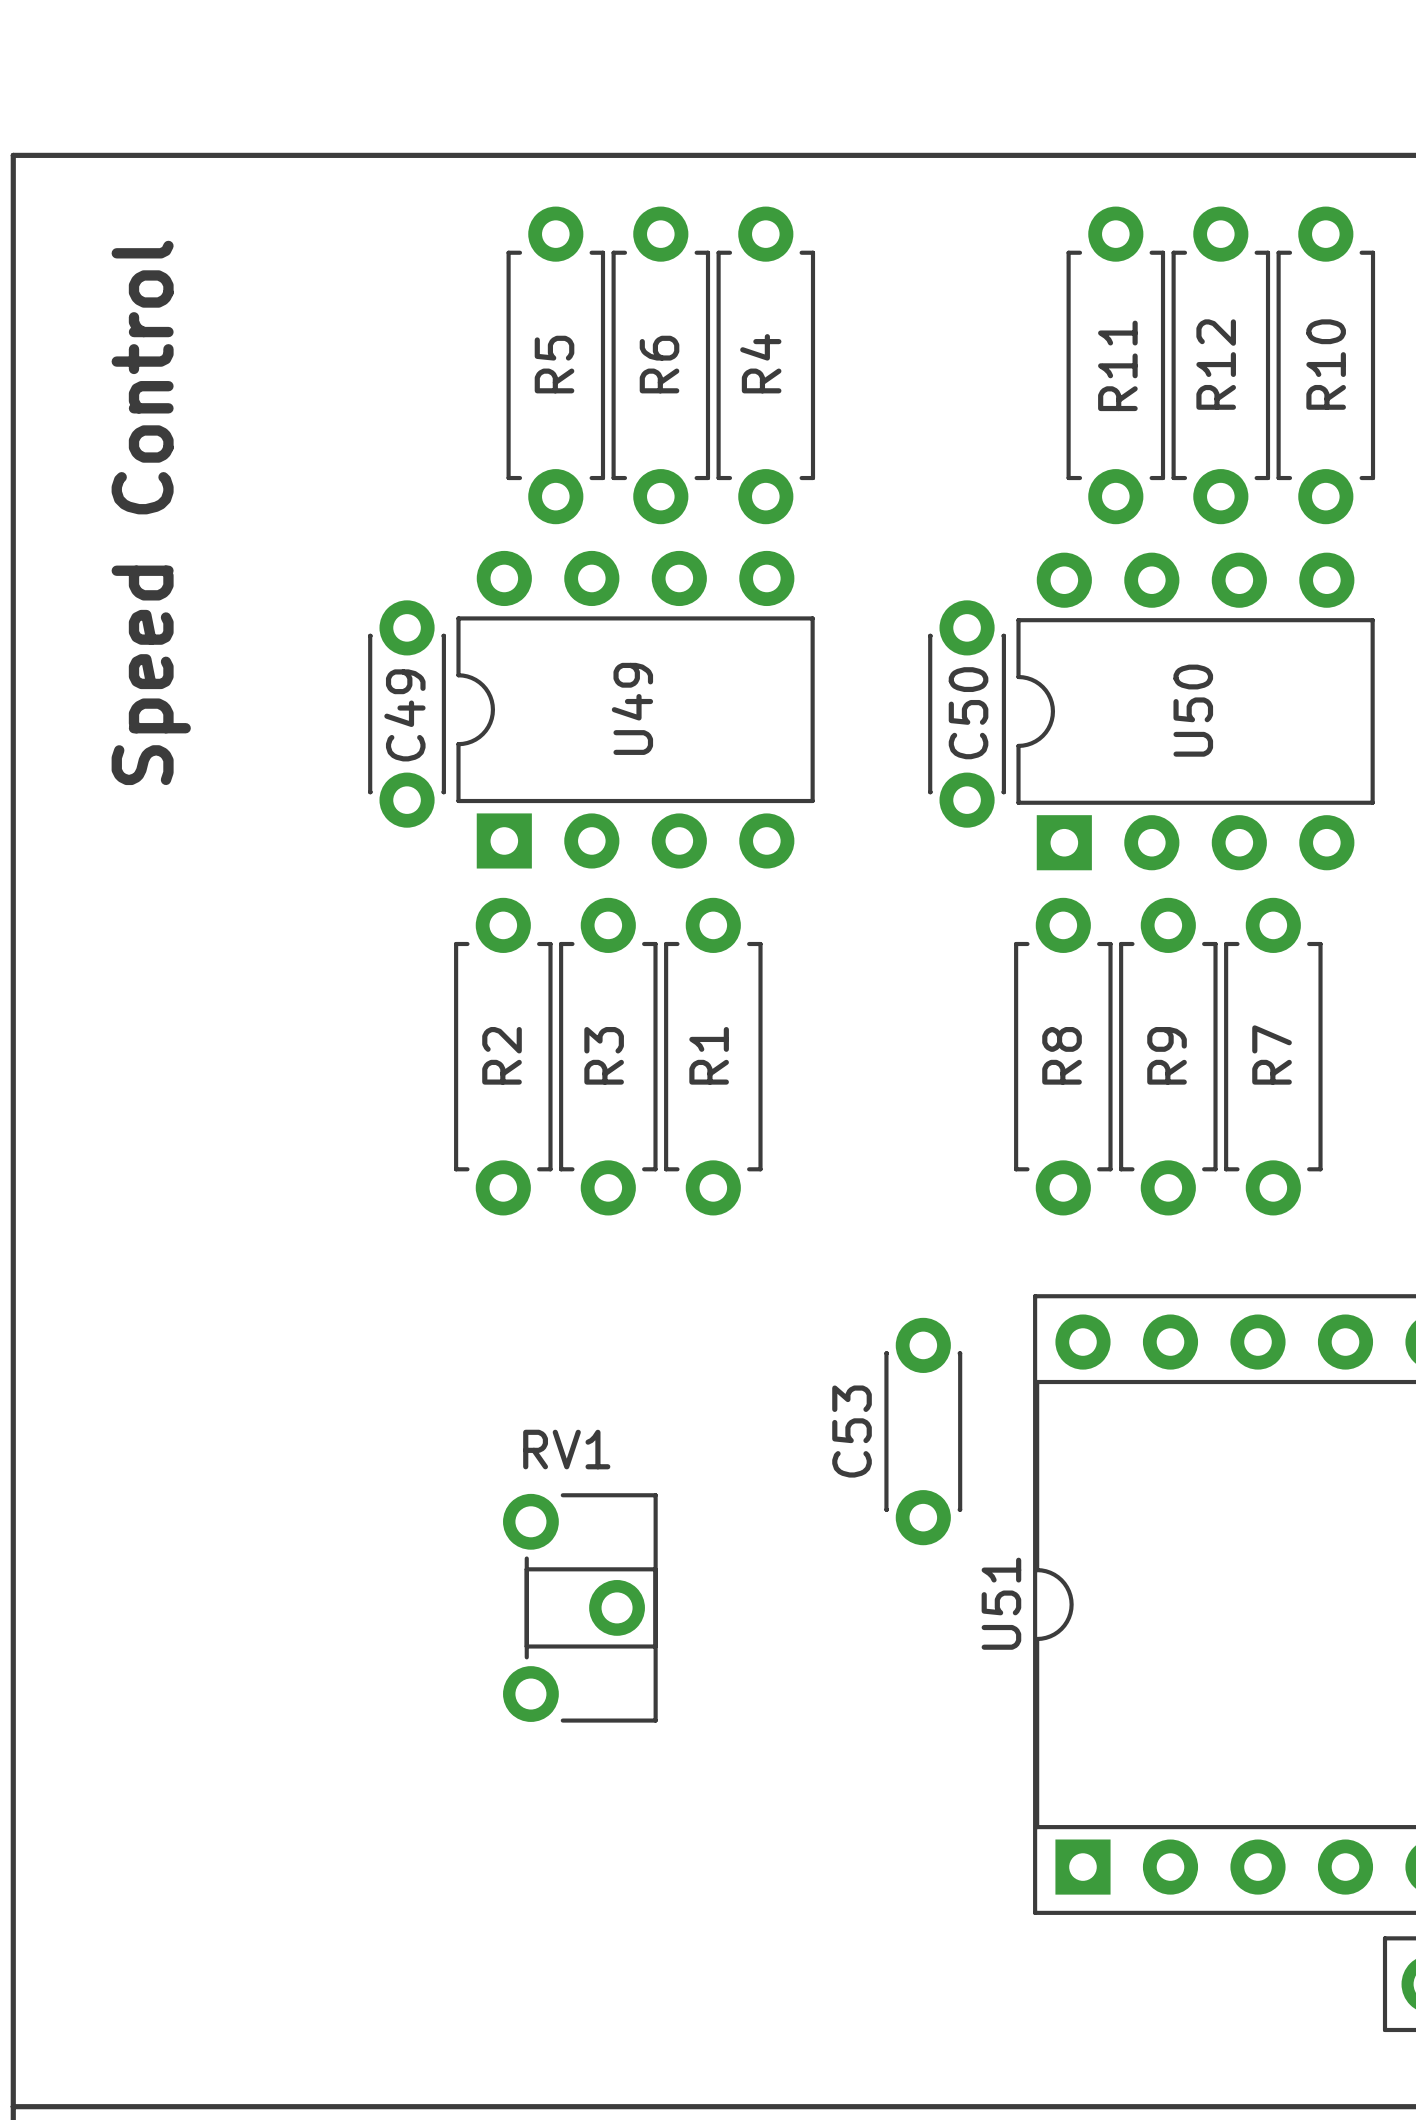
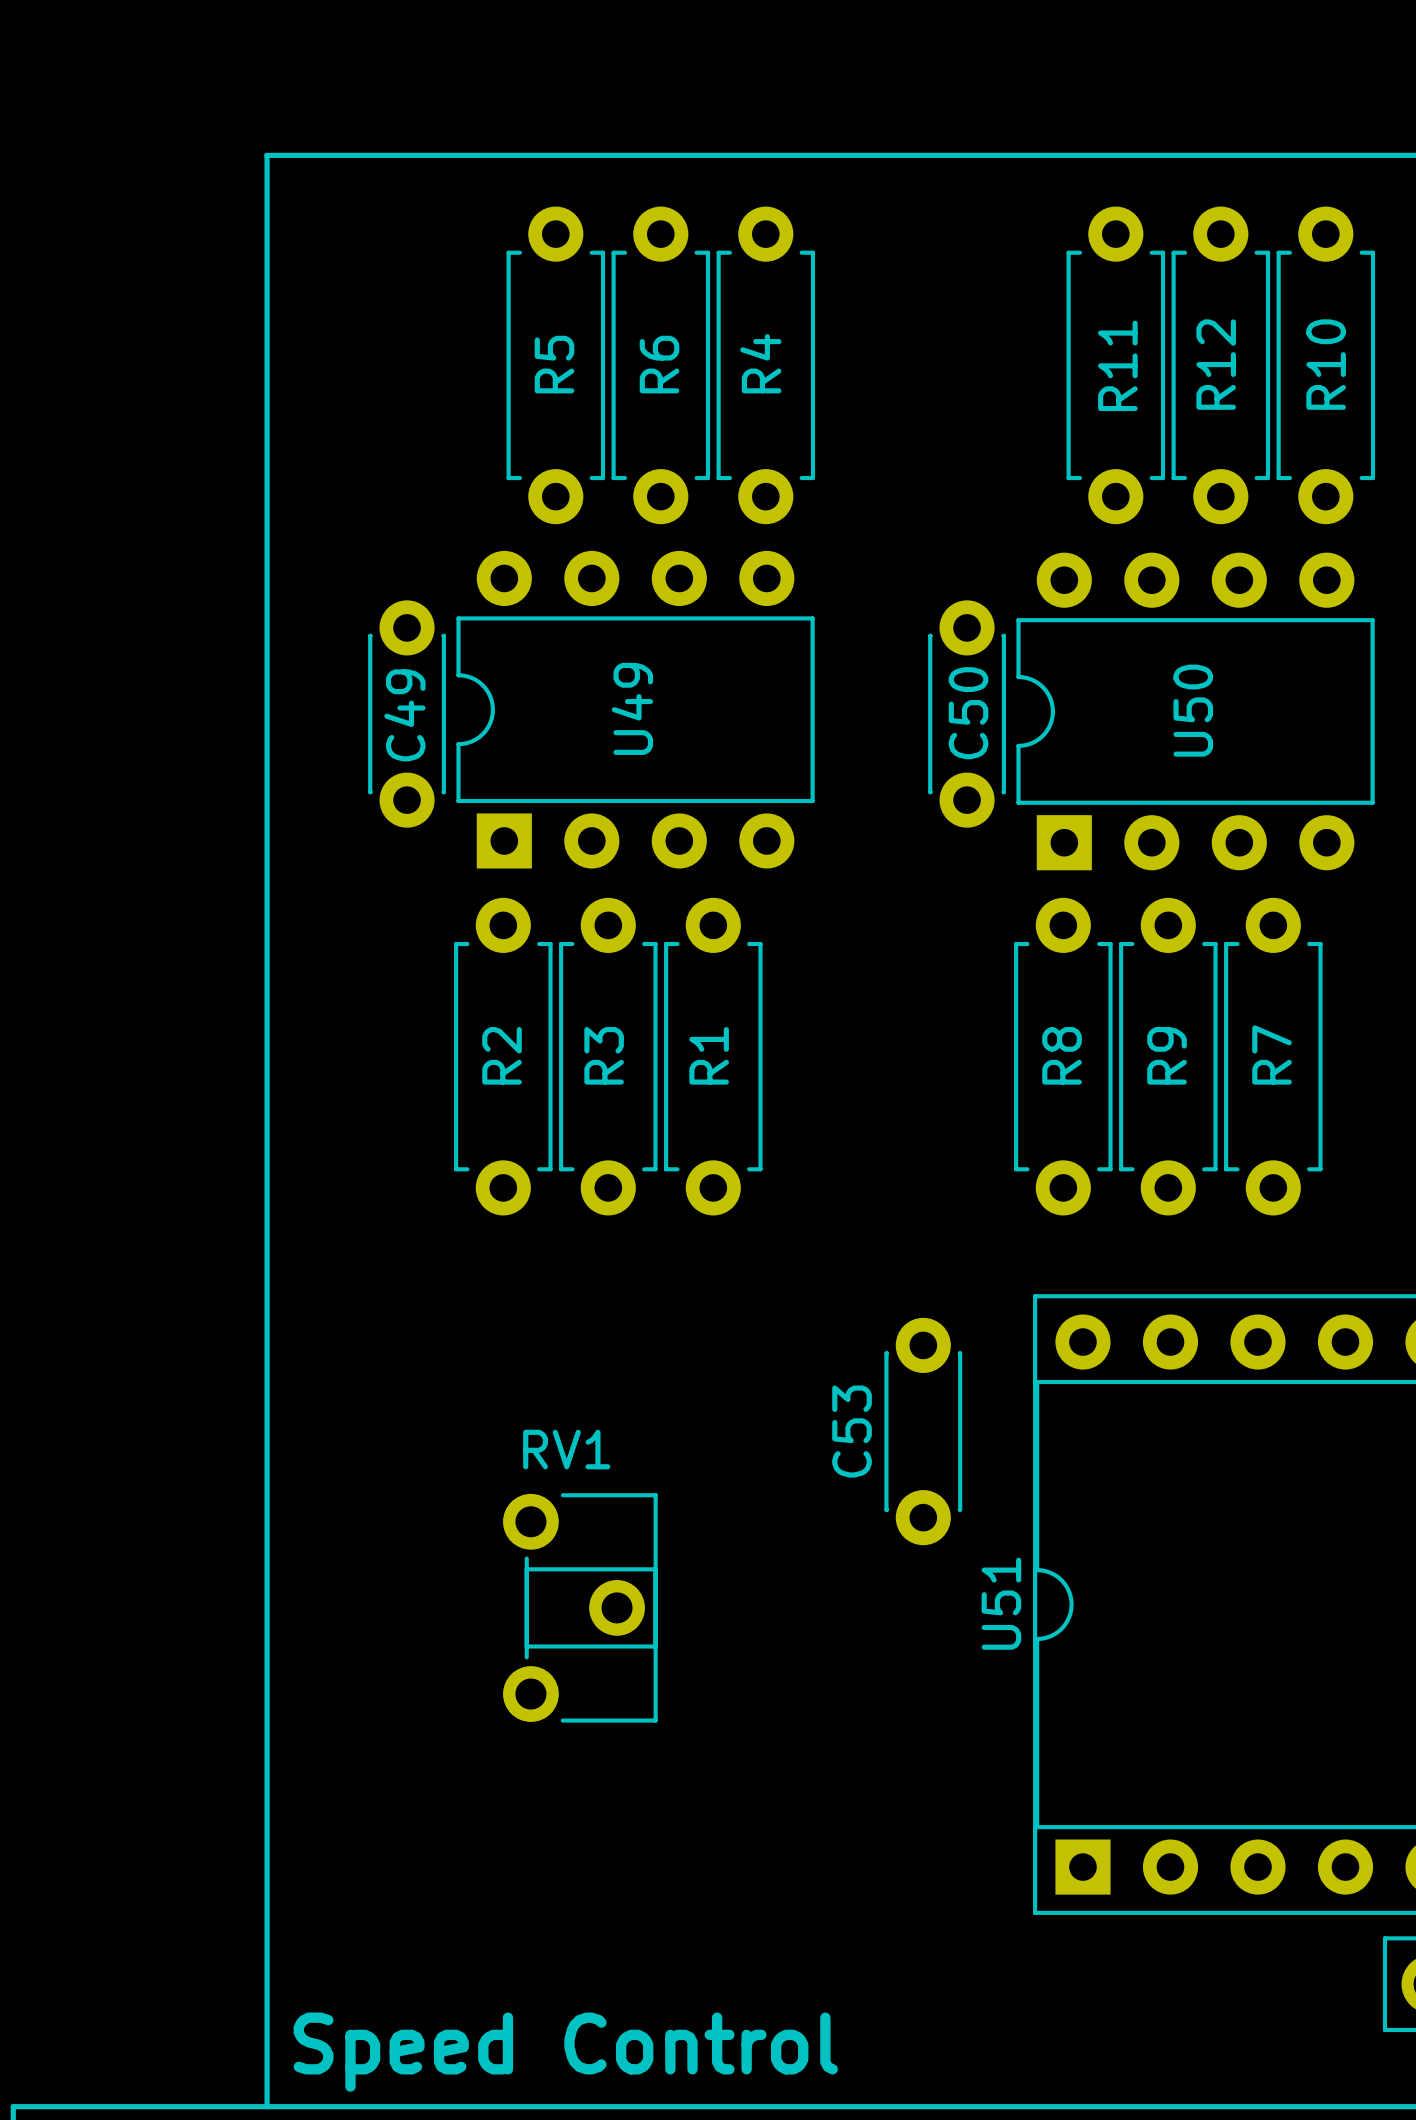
line: (267, 155) (13, 155) (13, 2106) -> (267, 155) (267, 2106)
text: Speed Control (151, 512) -> none
text: none -> Speed Control (565, 2052)

